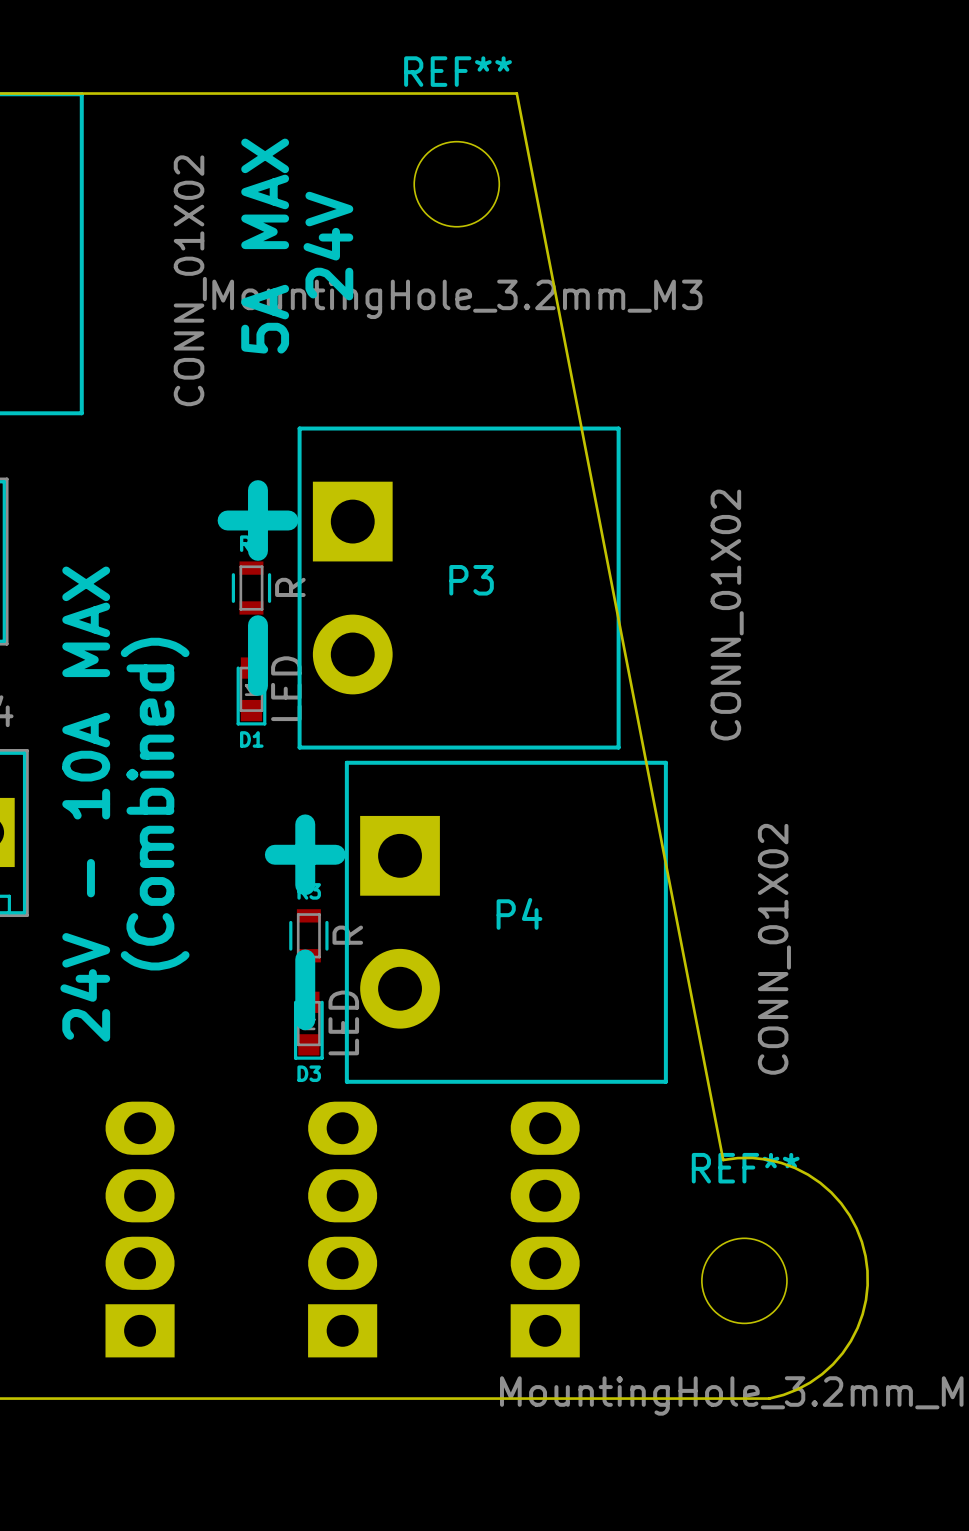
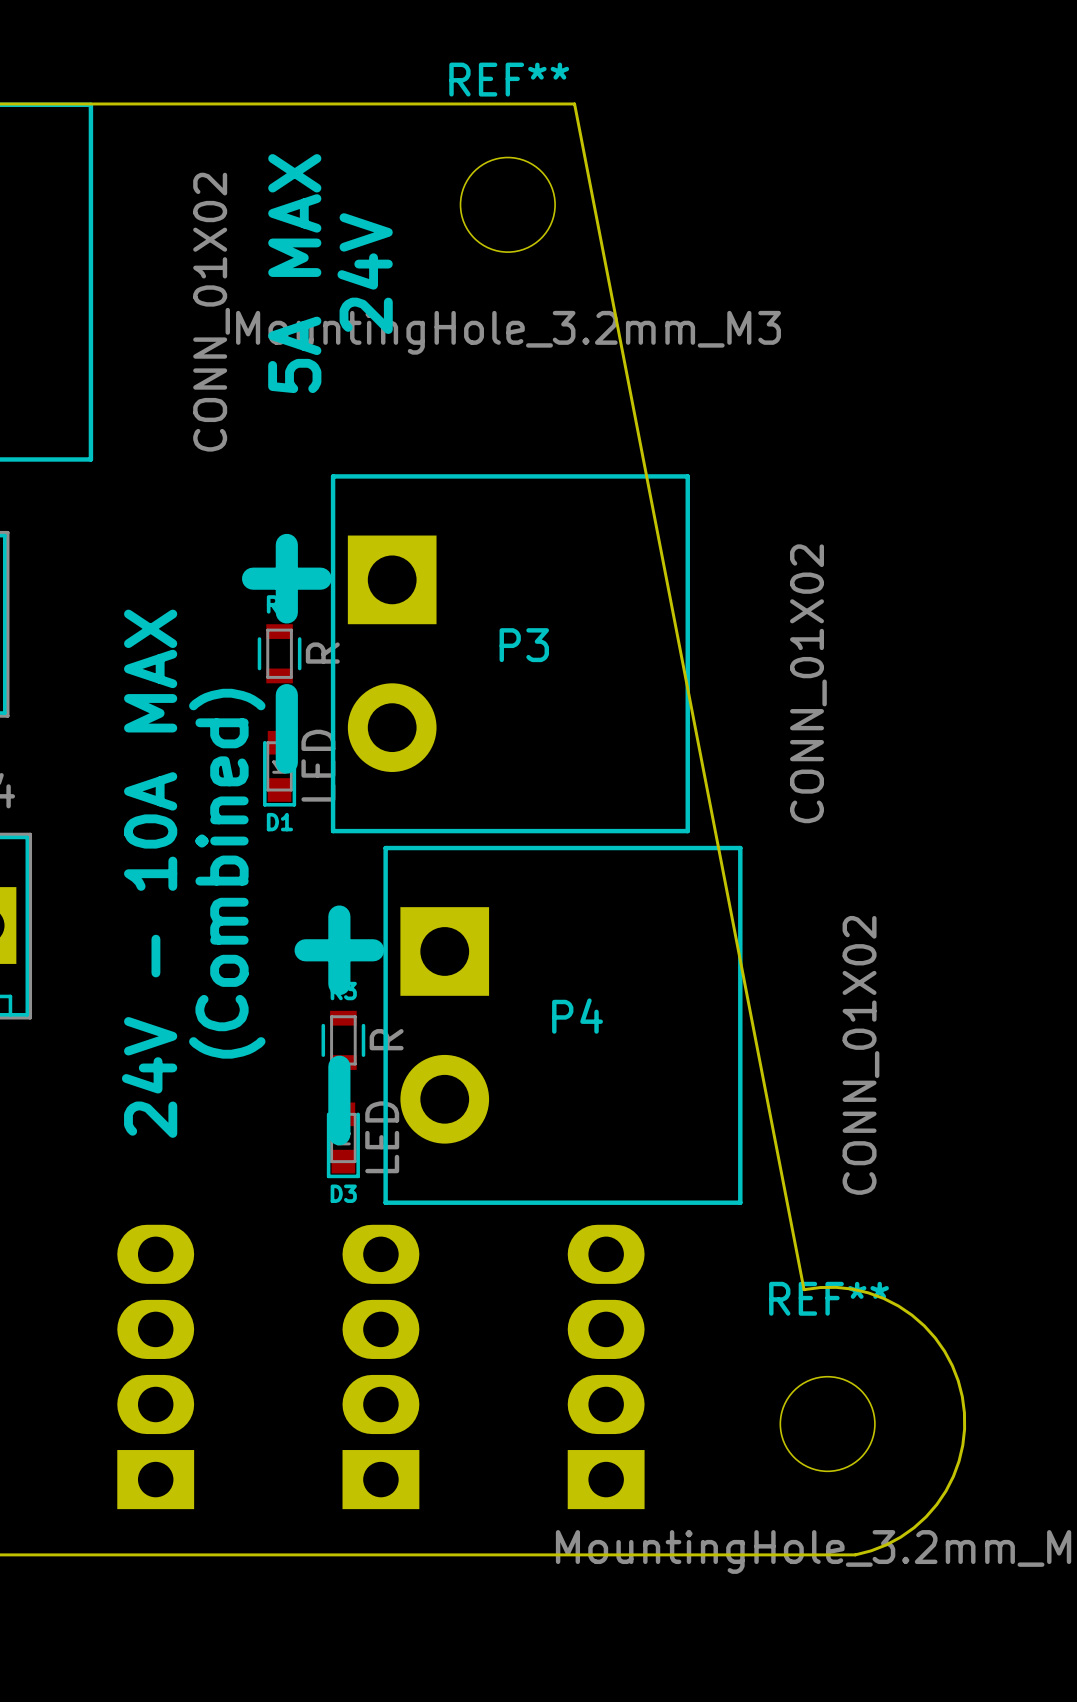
text: none -> (Combined) (227, 873)
text: 24V - 10A MAX (85, 804) -> none
text: (Combined) (155, 804) -> 24V - 10A MAX (149, 873)

